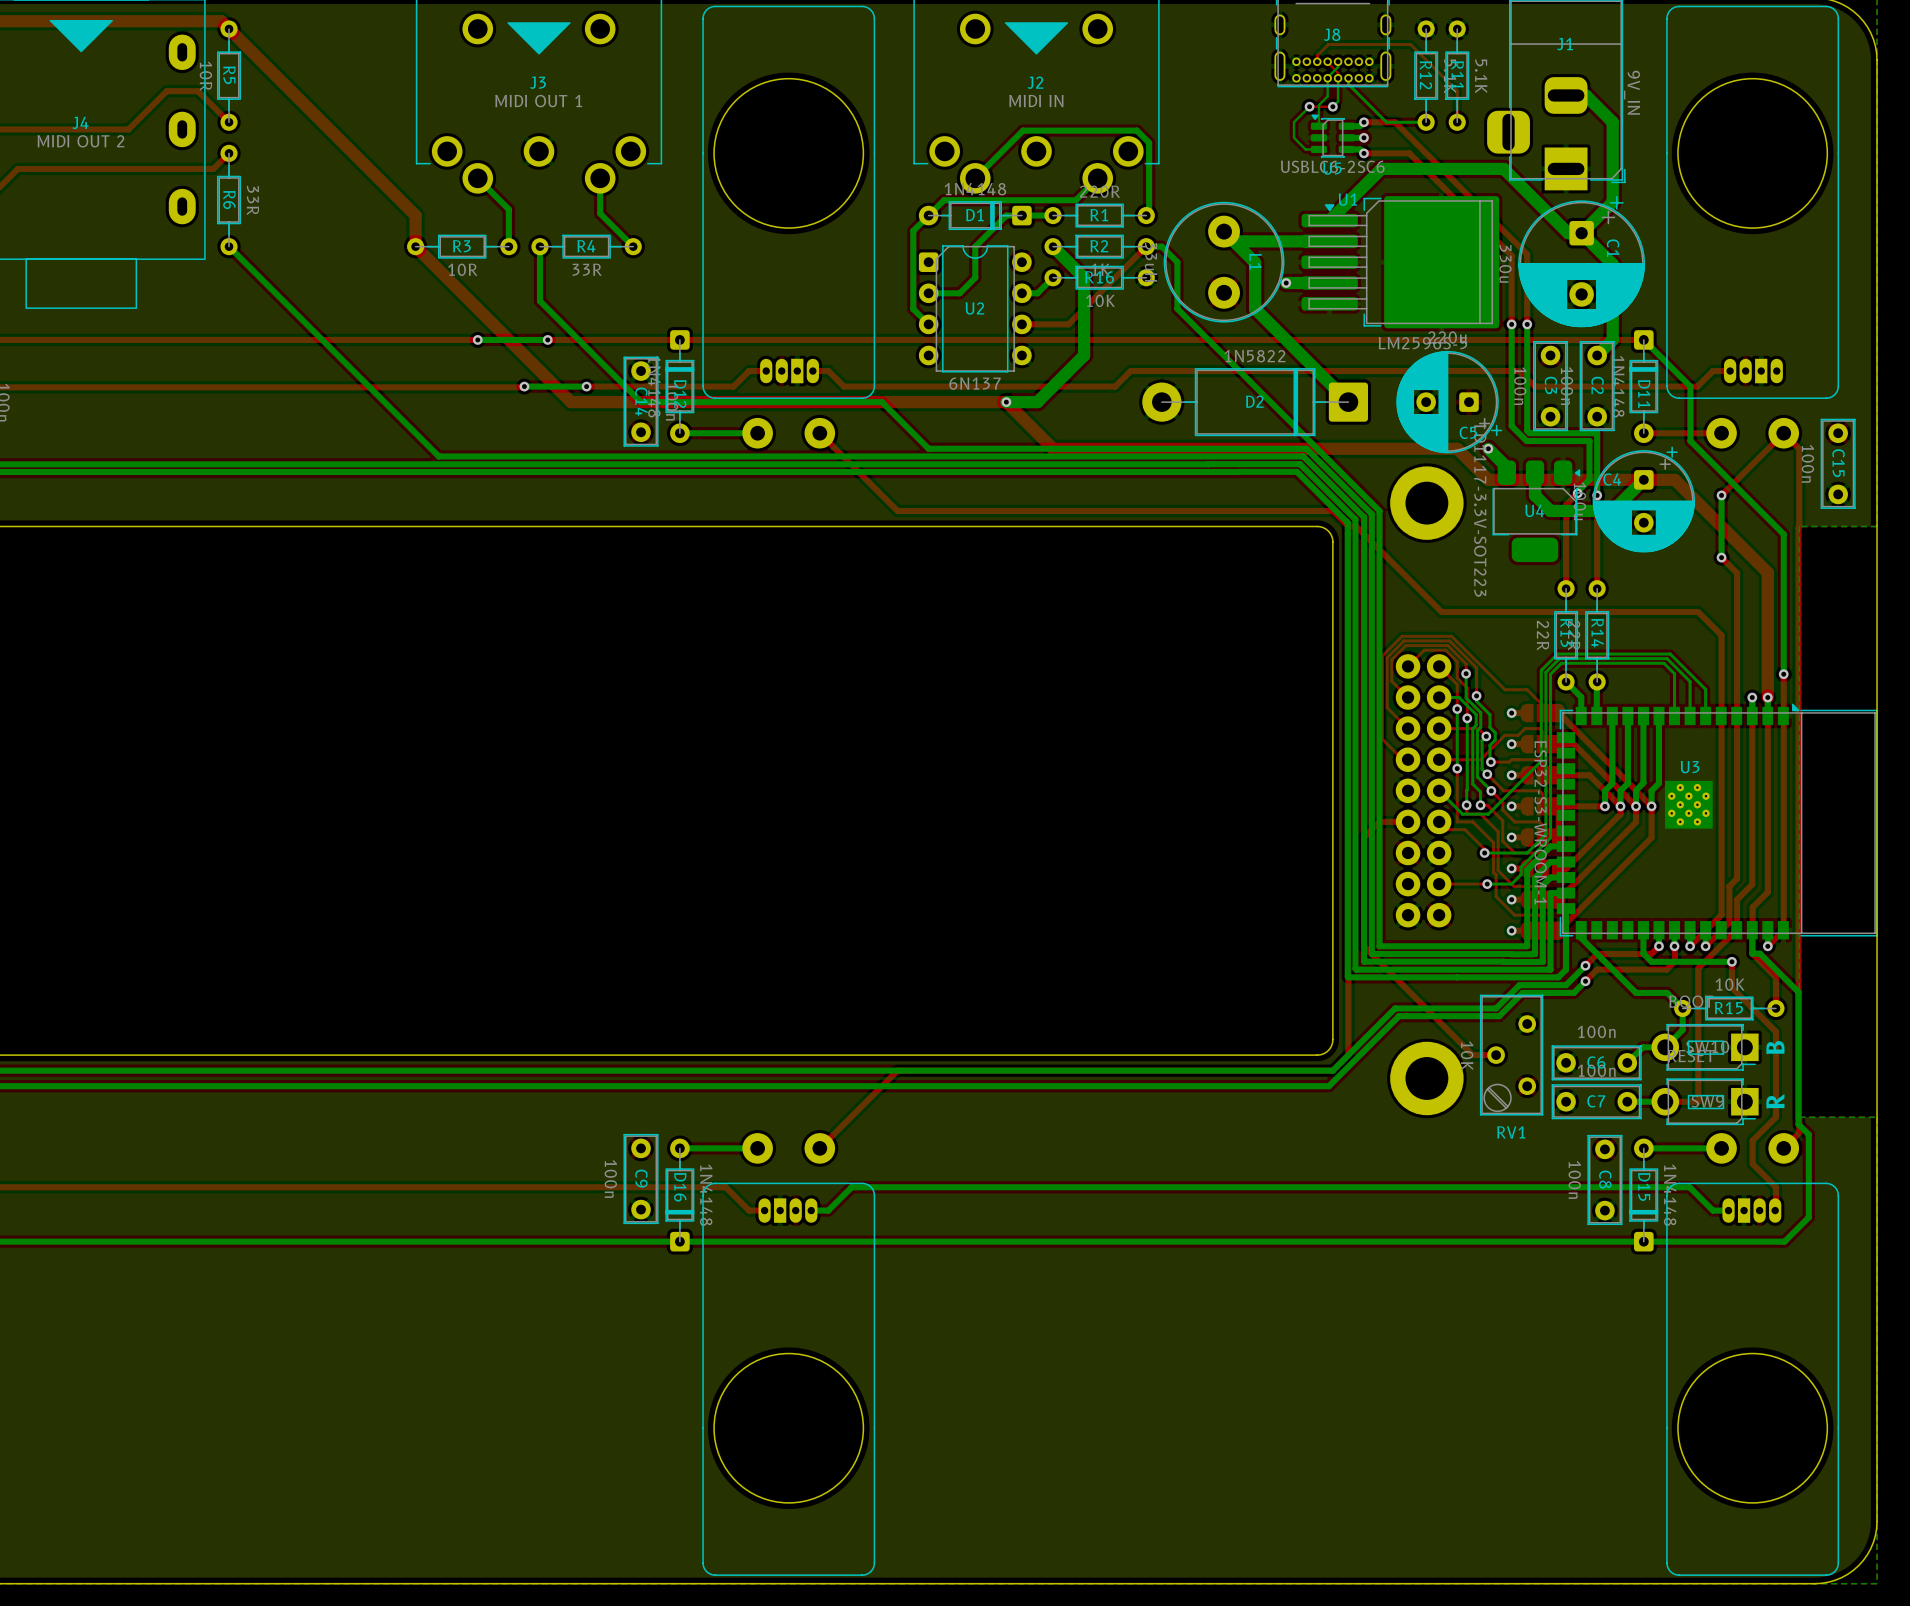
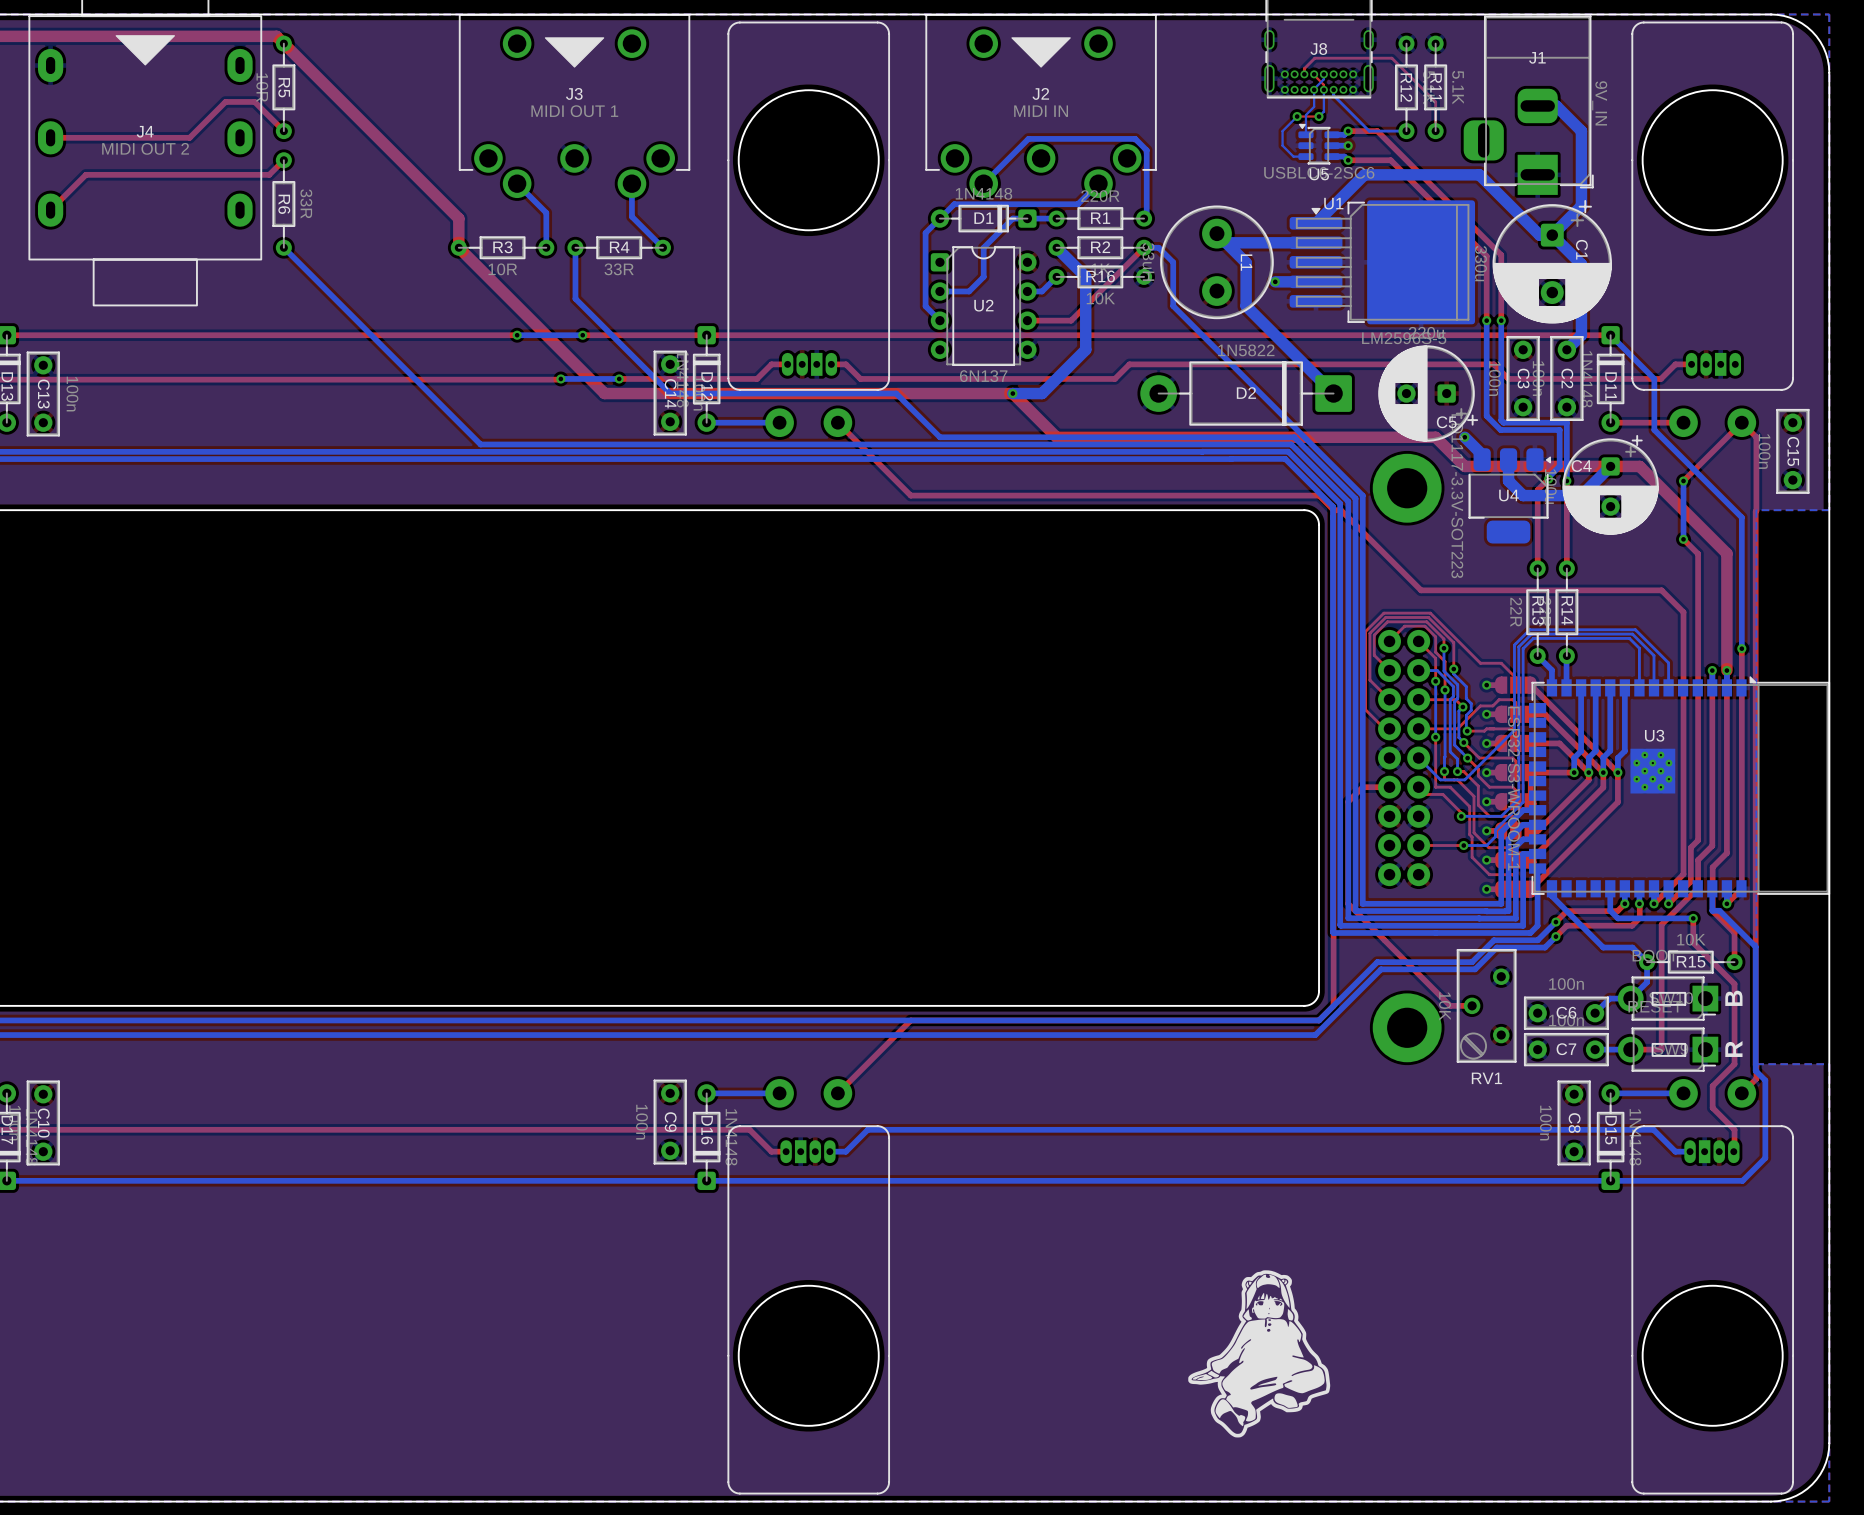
drawing: none -> [1188, 1270, 1331, 1438]

